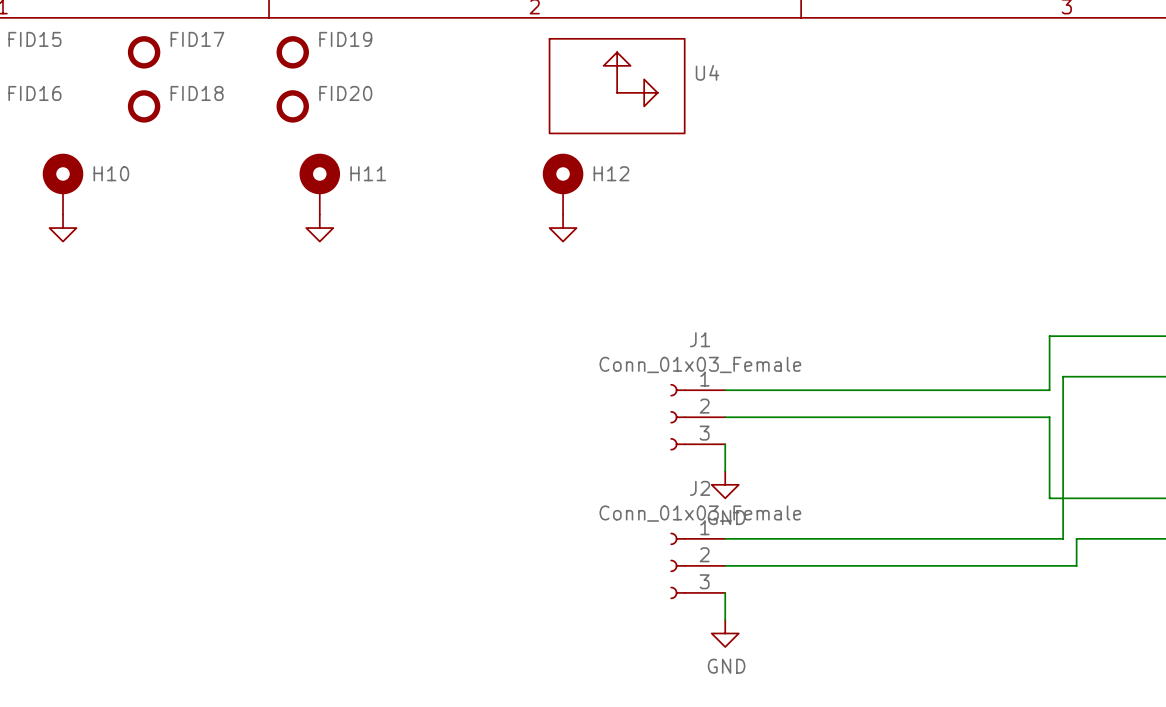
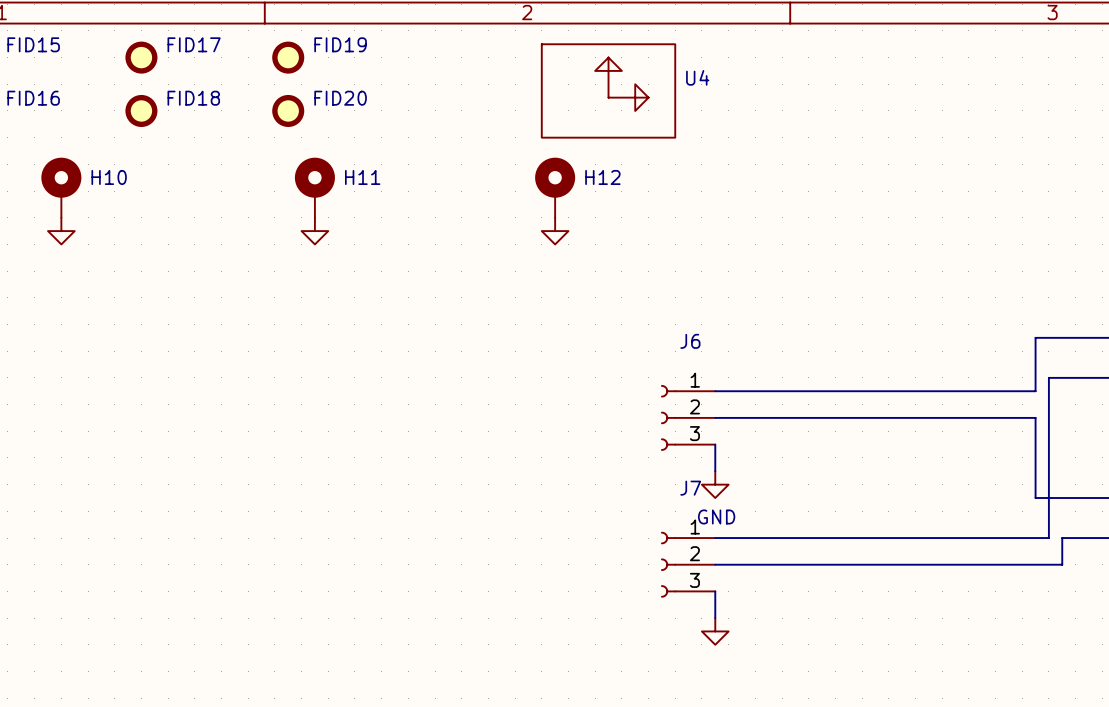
J1 name: J1 (700, 339) -> J6 (690, 341)
J1 value: Conn_01x03_Female (700, 364) -> none
J2 name: J2 (700, 488) -> J7 (690, 488)
J2 value: Conn_01x03_Female (700, 513) -> none
power symbol text: GND (726, 666) -> none

